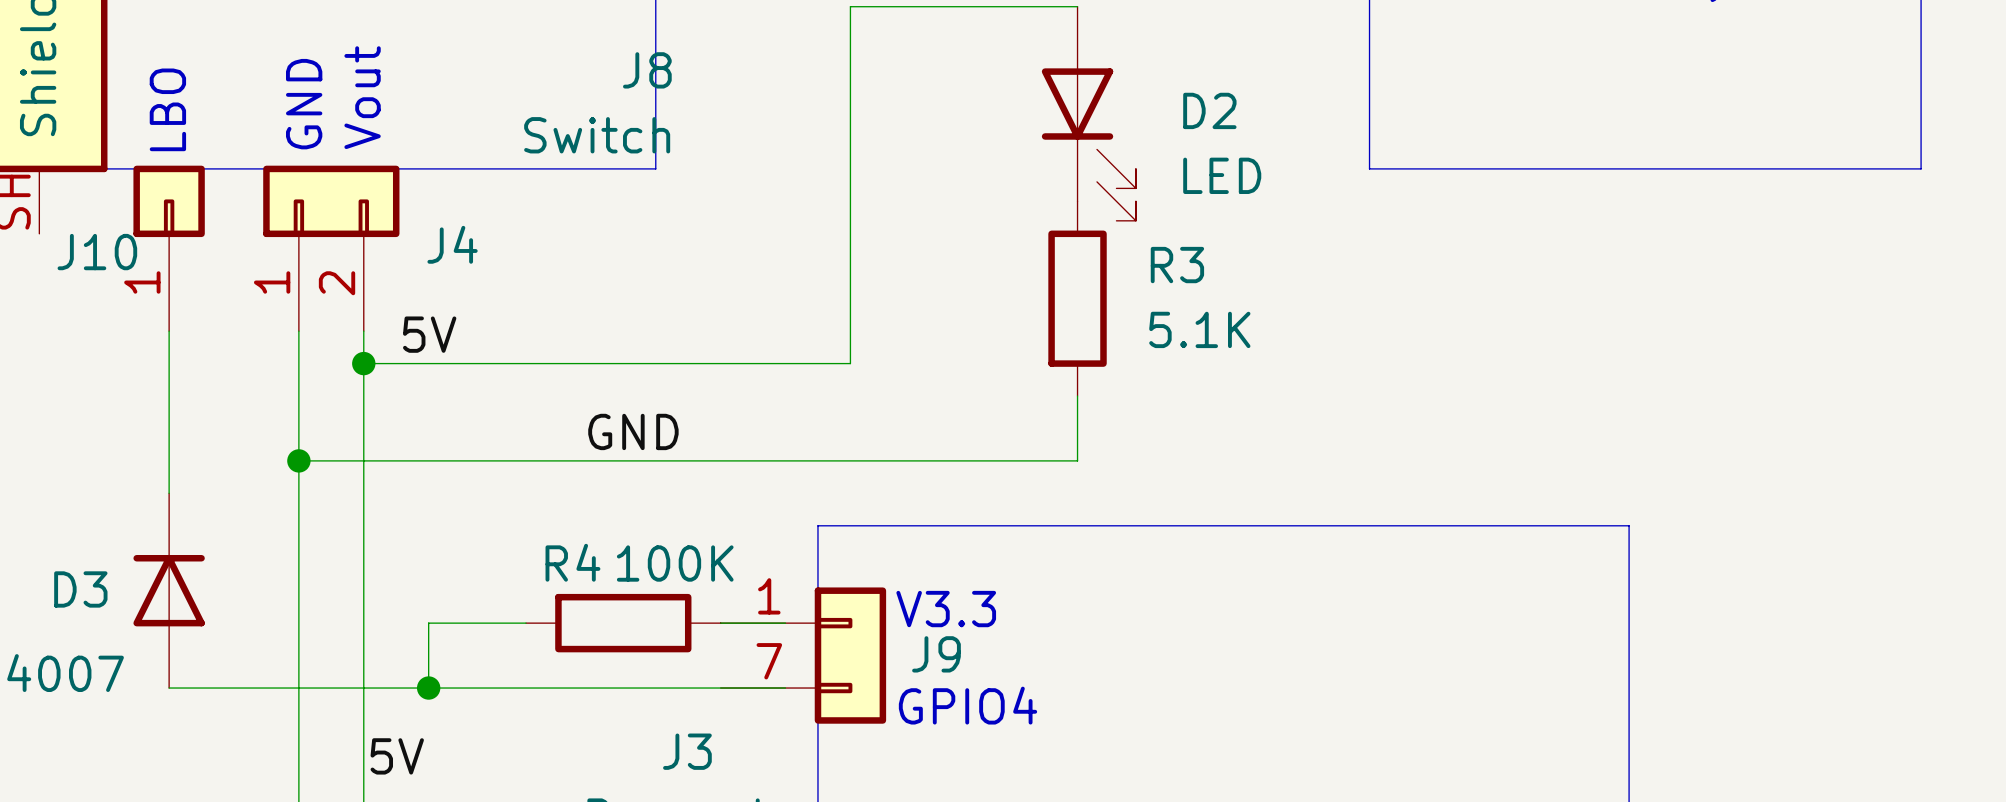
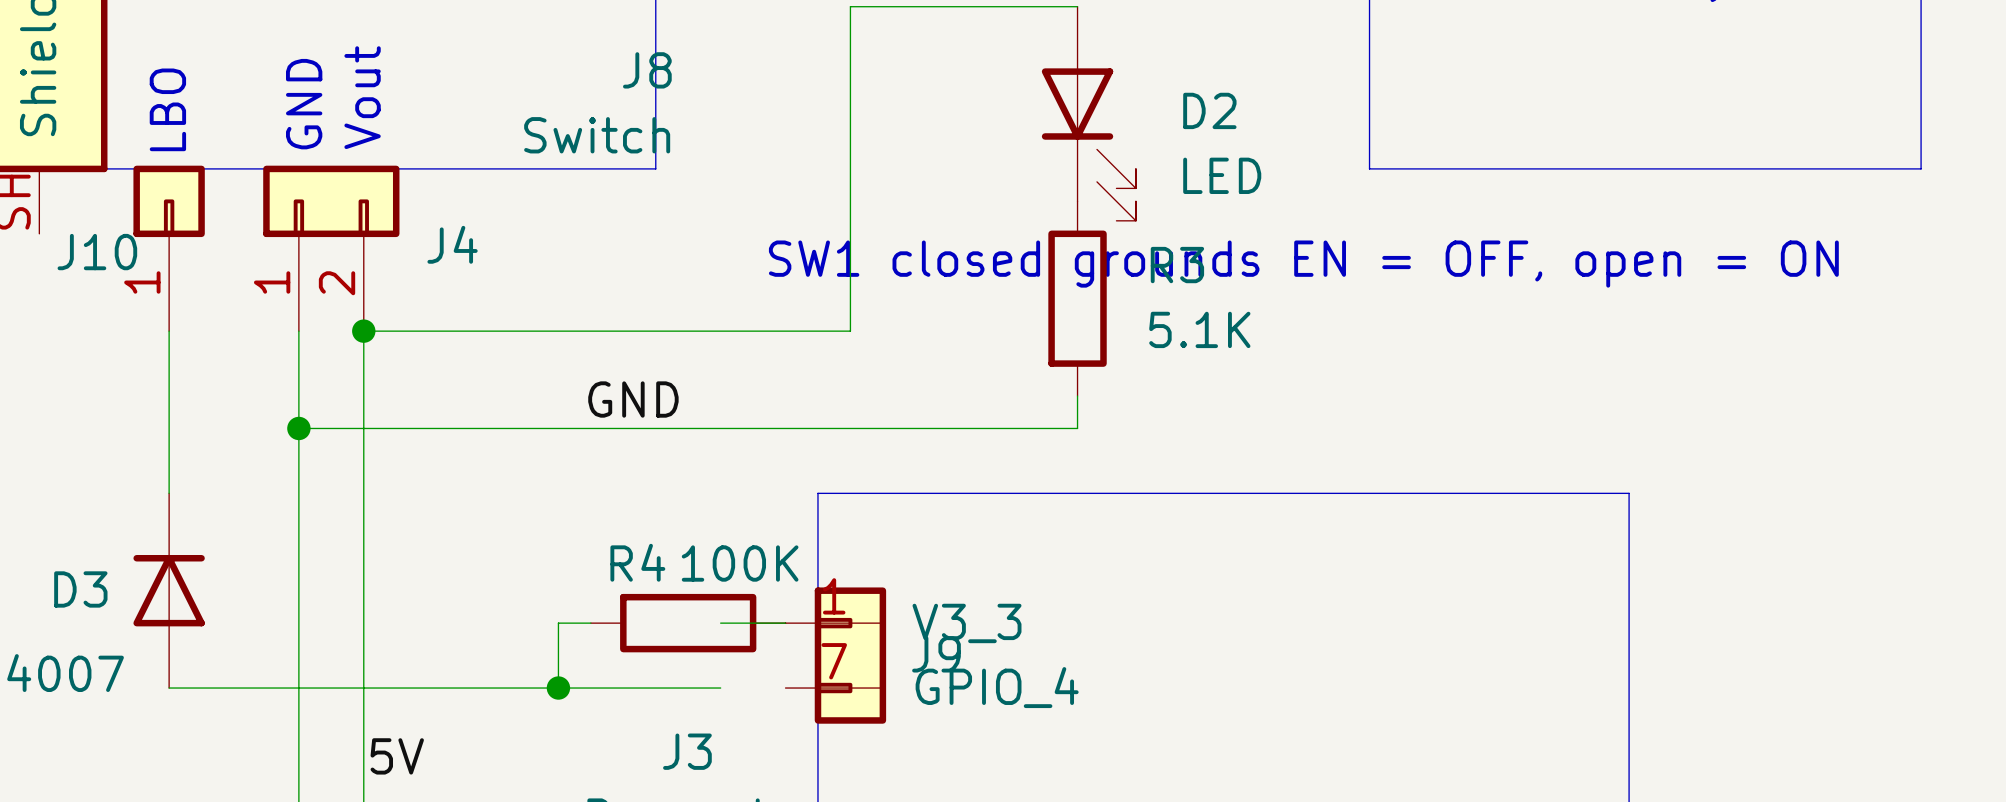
text: none -> SW1 closed grounds EN = OFF, open = ON (1303, 264)
wire: (850, 331) (850, 363) (363, 363) -> (850, 331) (363, 331)
label: 5V (429, 334) -> none
junction position: (363, 363) -> (363, 331)
wire: (1077, 428) (1077, 460) (298, 460) -> (1077, 428) (298, 428)
label position: GND (633, 431) -> GND (633, 399)
junction position: (298, 460) -> (298, 428)
line: (817, 525) (1629, 525) -> (817, 525) (817, 493) (1629, 493) (1629, 525)
J9 symbol: [720, 587, 887, 724] -> [785, 587, 887, 724]
text: V3.3 (946, 609) -> none
wire: (525, 623) (428, 623) (428, 688) -> none
wire: none -> (590, 623) (558, 623) (558, 688)
R4 position: (623, 623) -> (688, 623)
junction position: (428, 688) -> (558, 688)
wire: (720, 688) (785, 688) -> none
text: GPIO4 (968, 705) -> none

